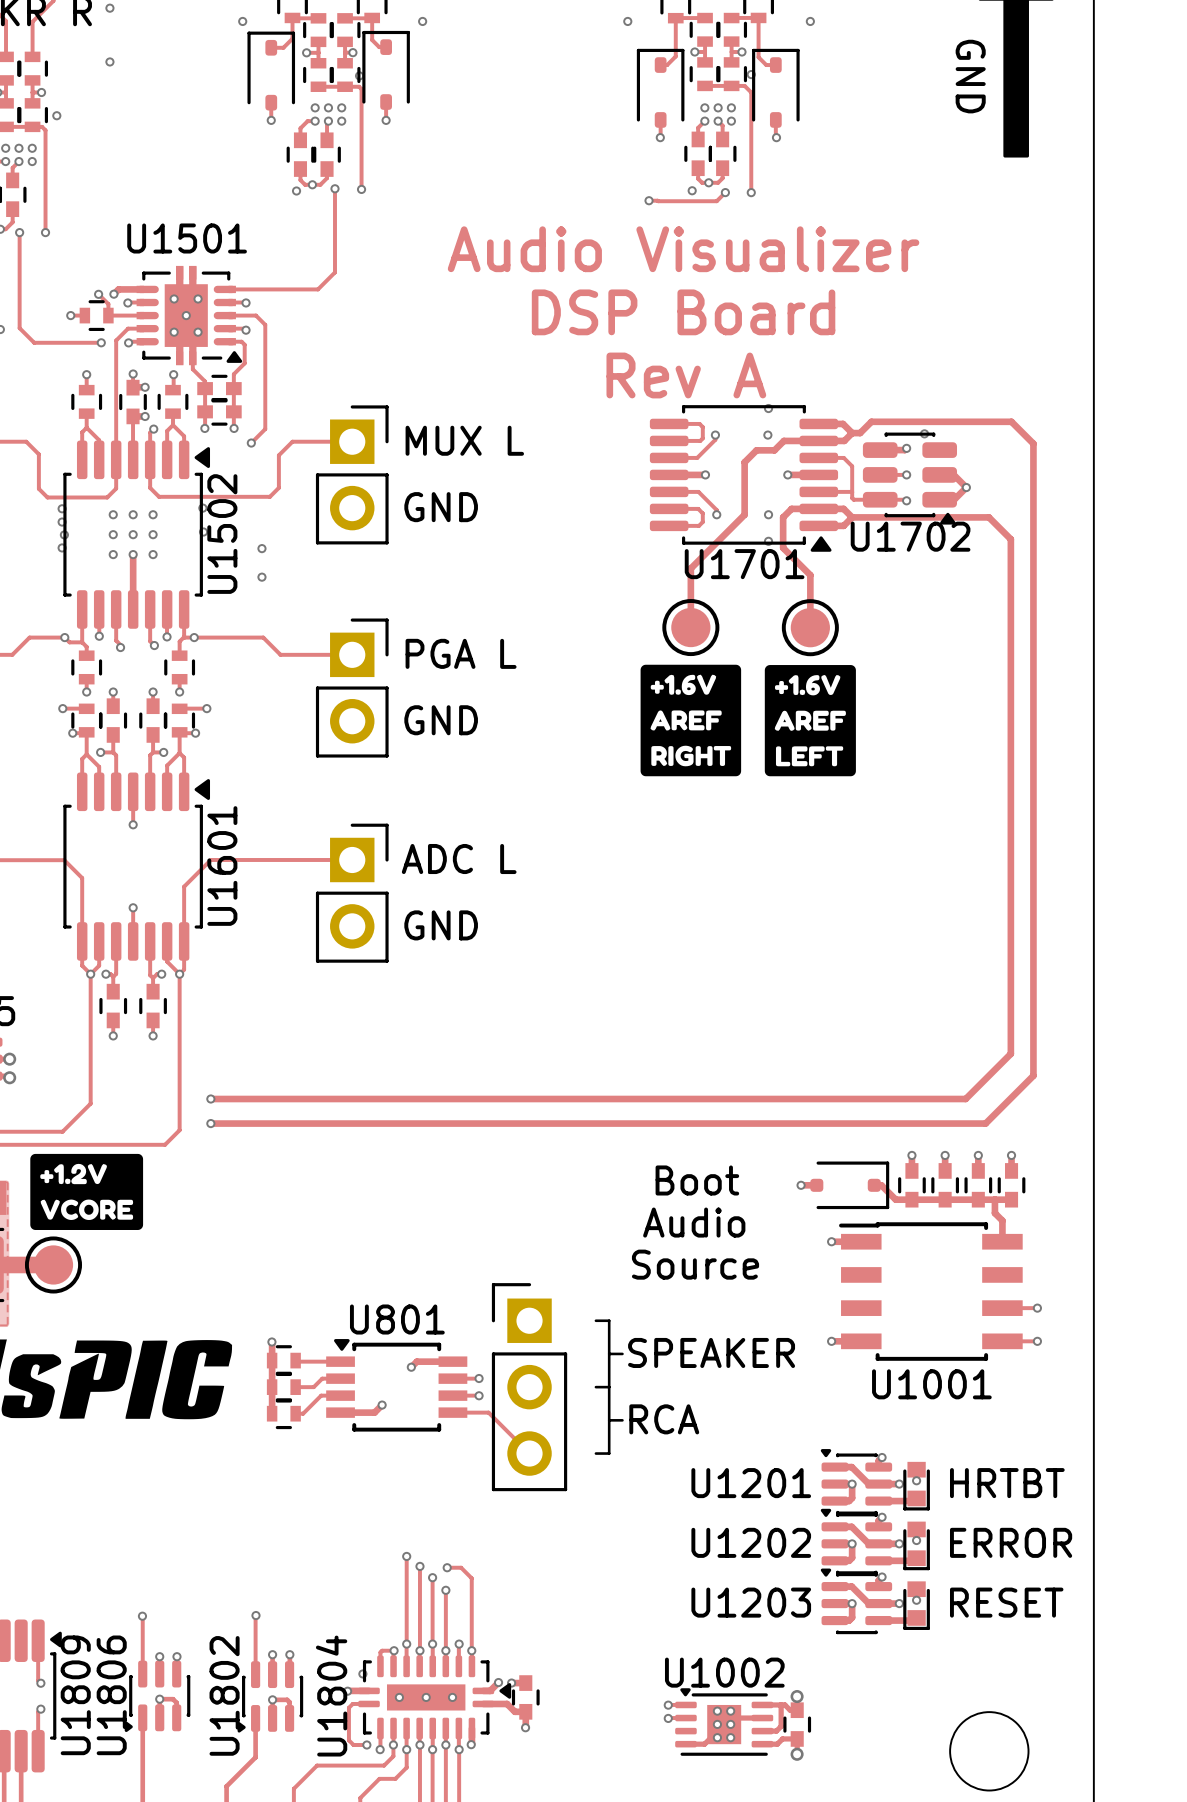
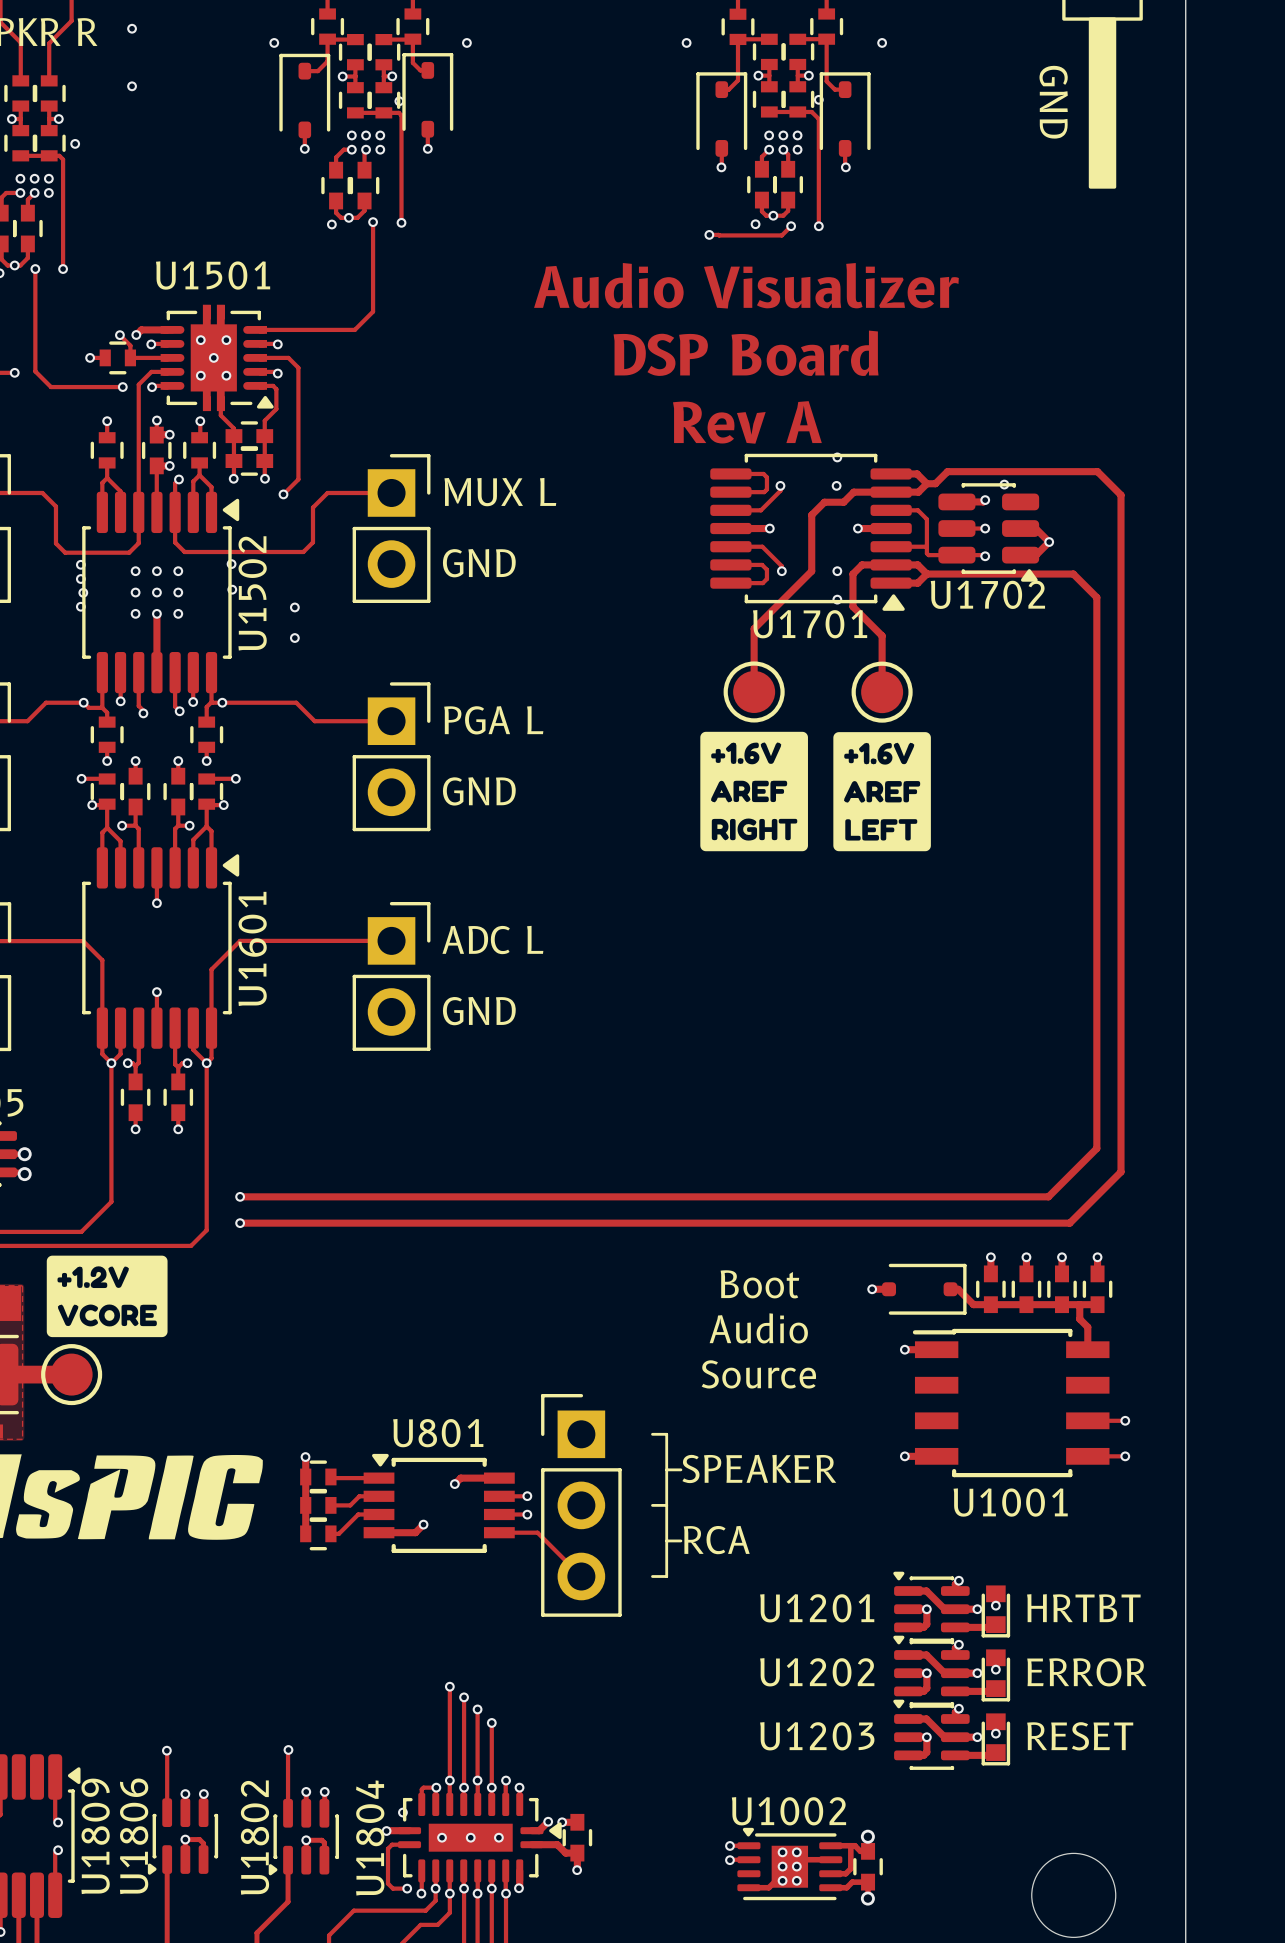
track: (447, 1567) (461, 1567) (471, 1578) (471, 1650) -> none
via: (447, 1567) -> none

